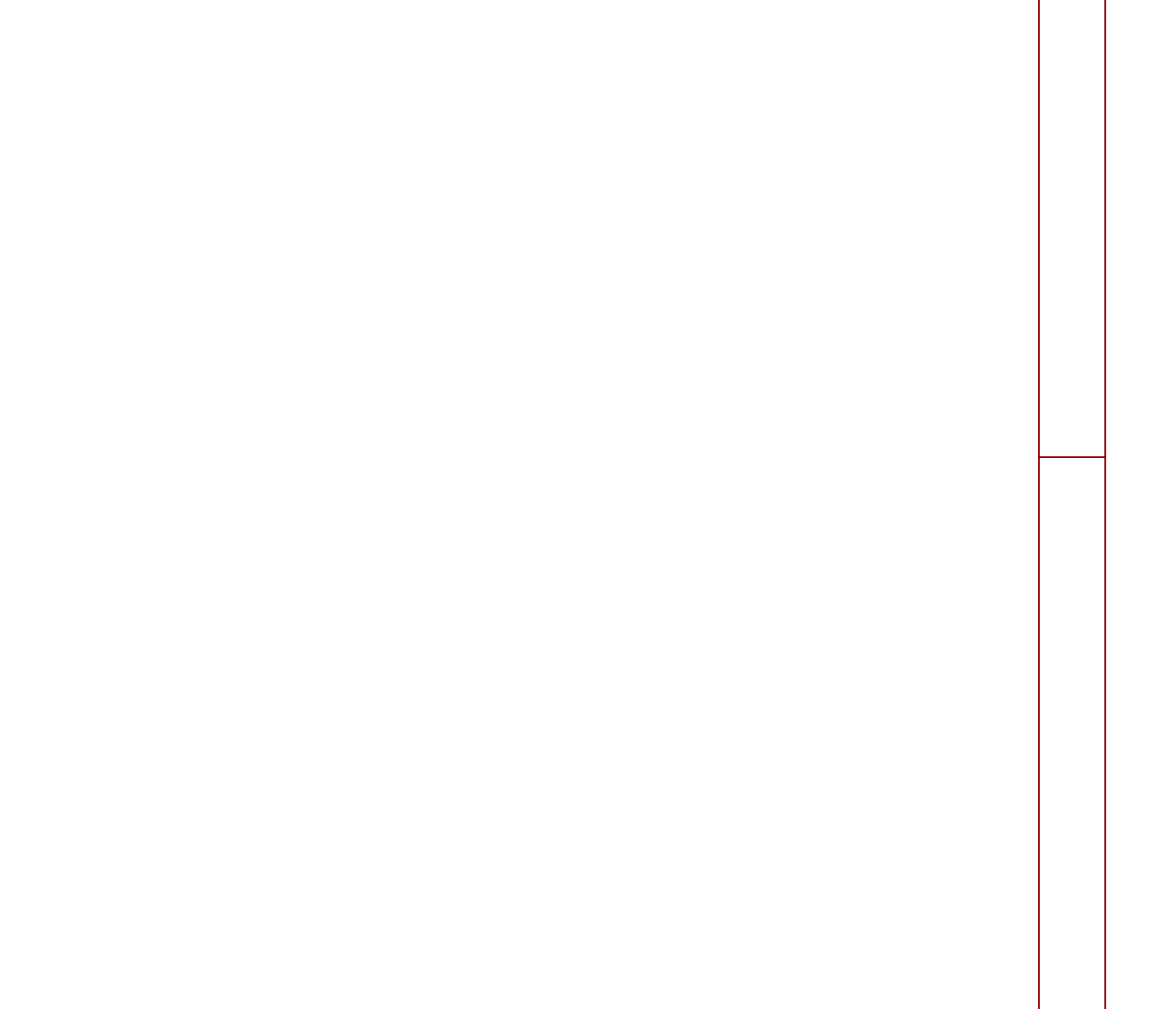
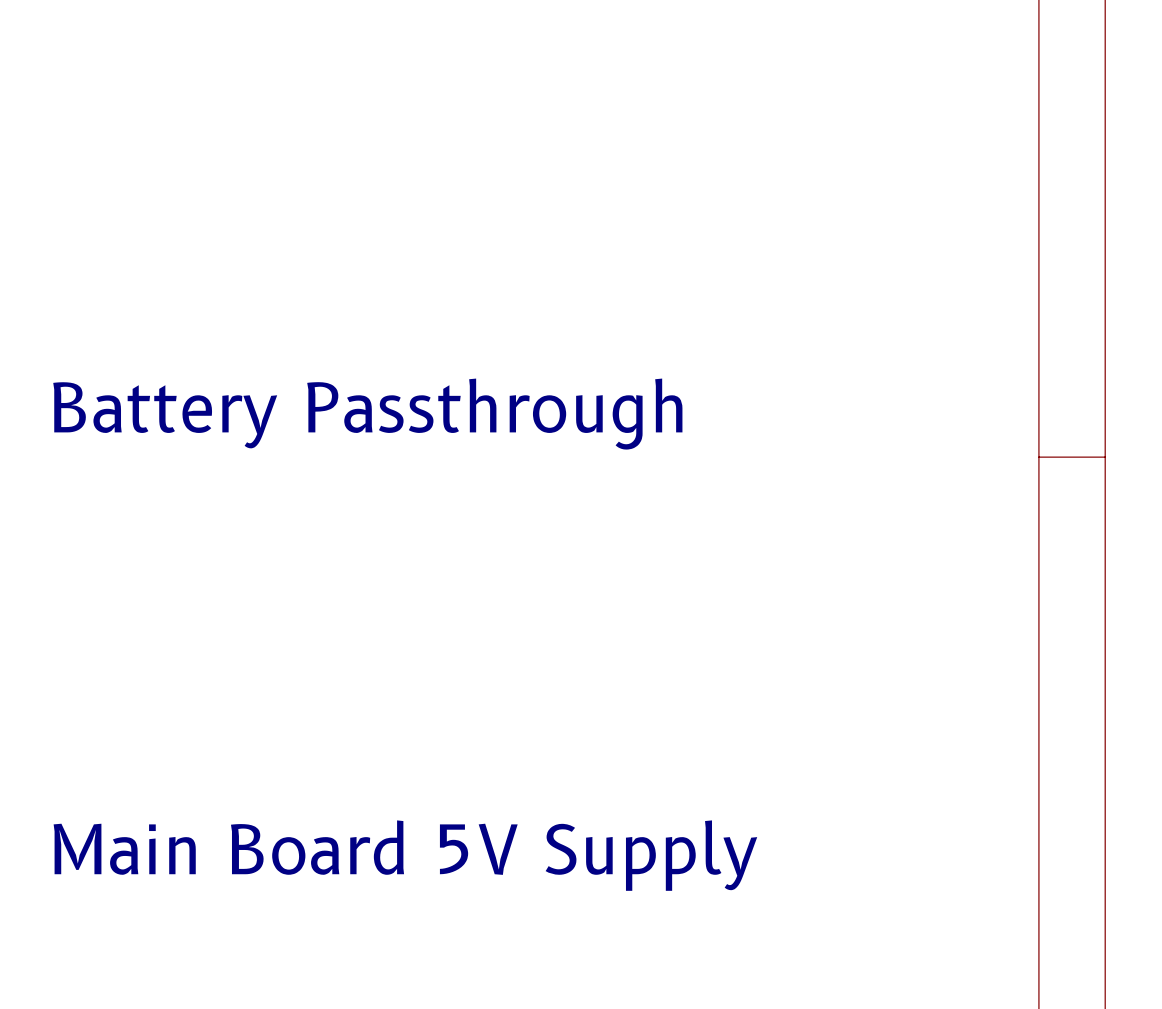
text: none -> Battery Passthrough (367, 414)
text: none -> Main Board 5V Supply (405, 855)

